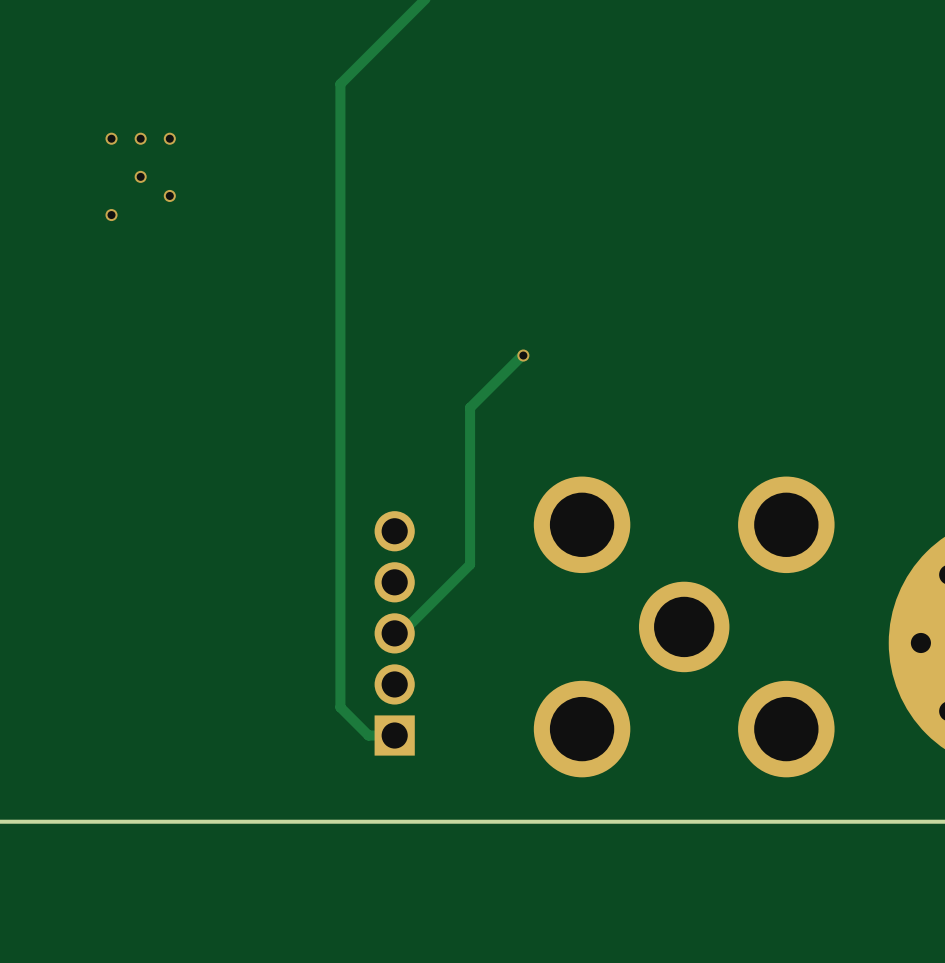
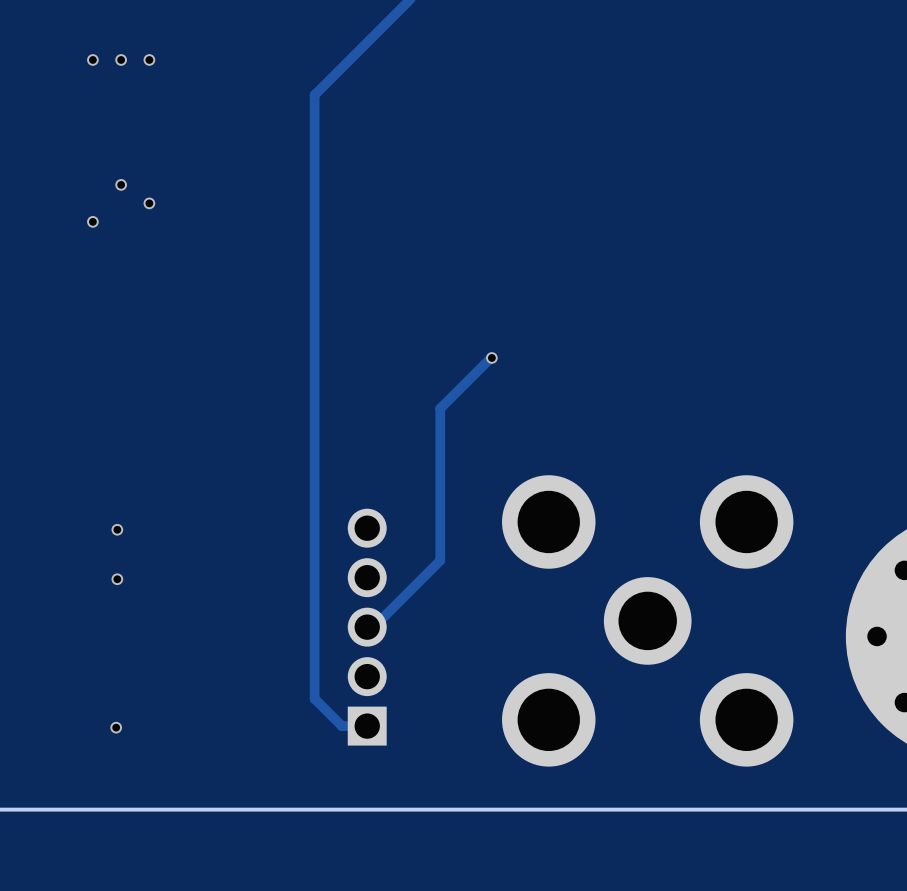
via: none -> (92, 59)
via: none -> (121, 59)
via: none -> (149, 59)
via: (111, 138) -> none
via: (140, 138) -> none
via: (169, 138) -> none
via: none -> (117, 529)
via: none -> (117, 579)
via: none -> (116, 727)

